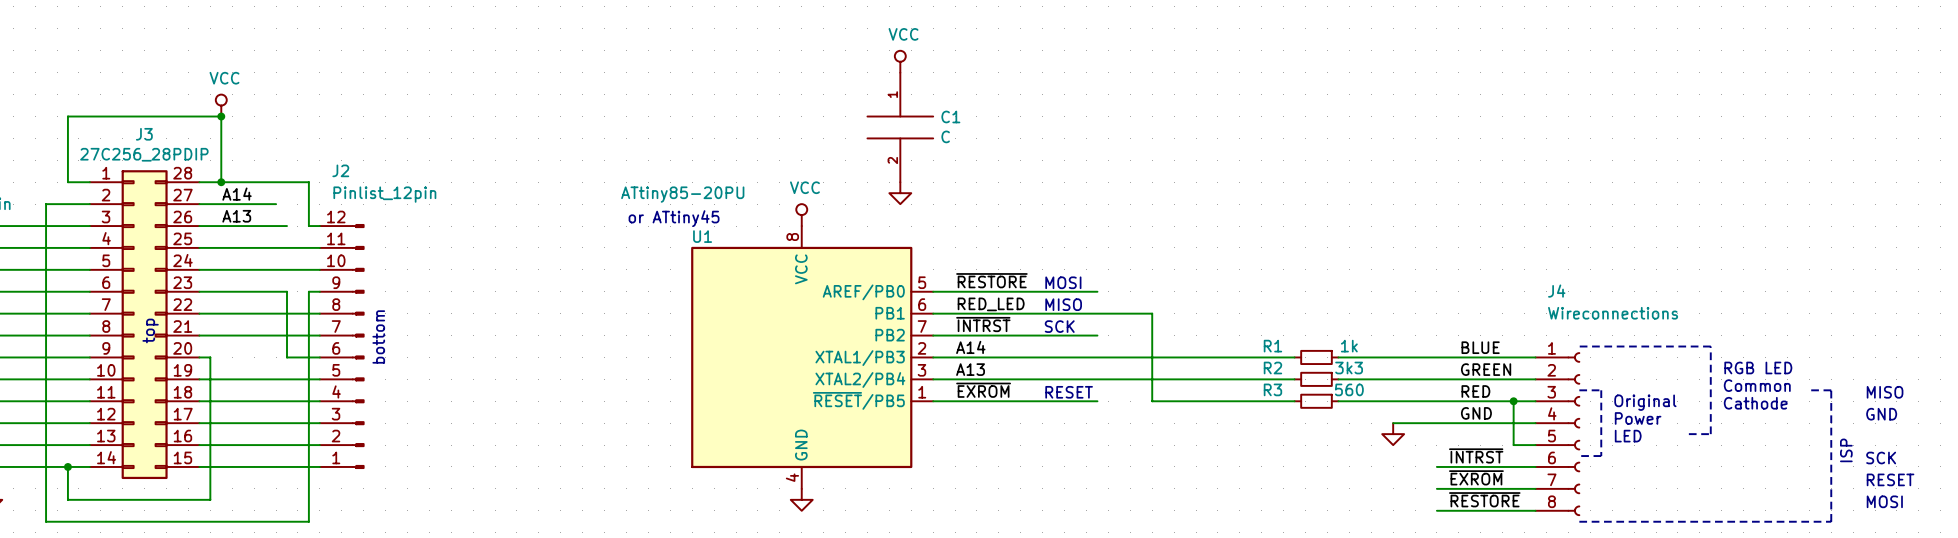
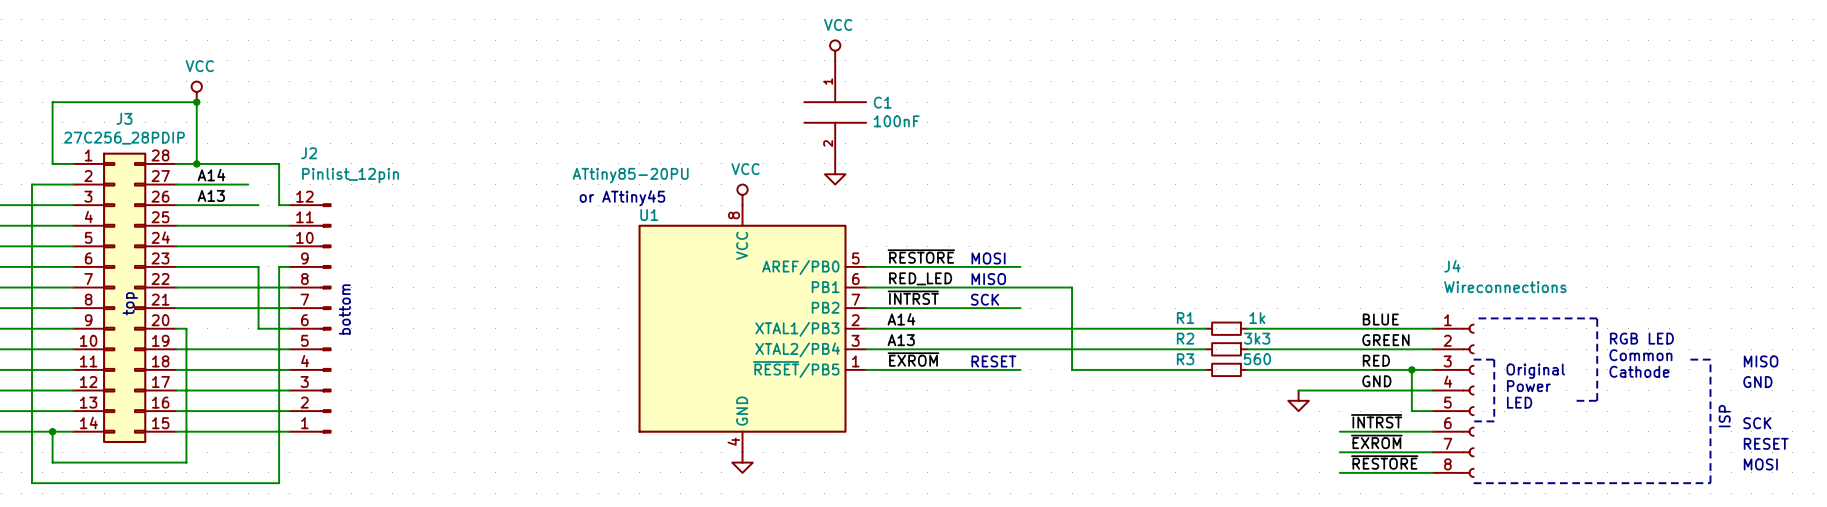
C1 value: C (945, 136) -> 100nF (896, 121)

